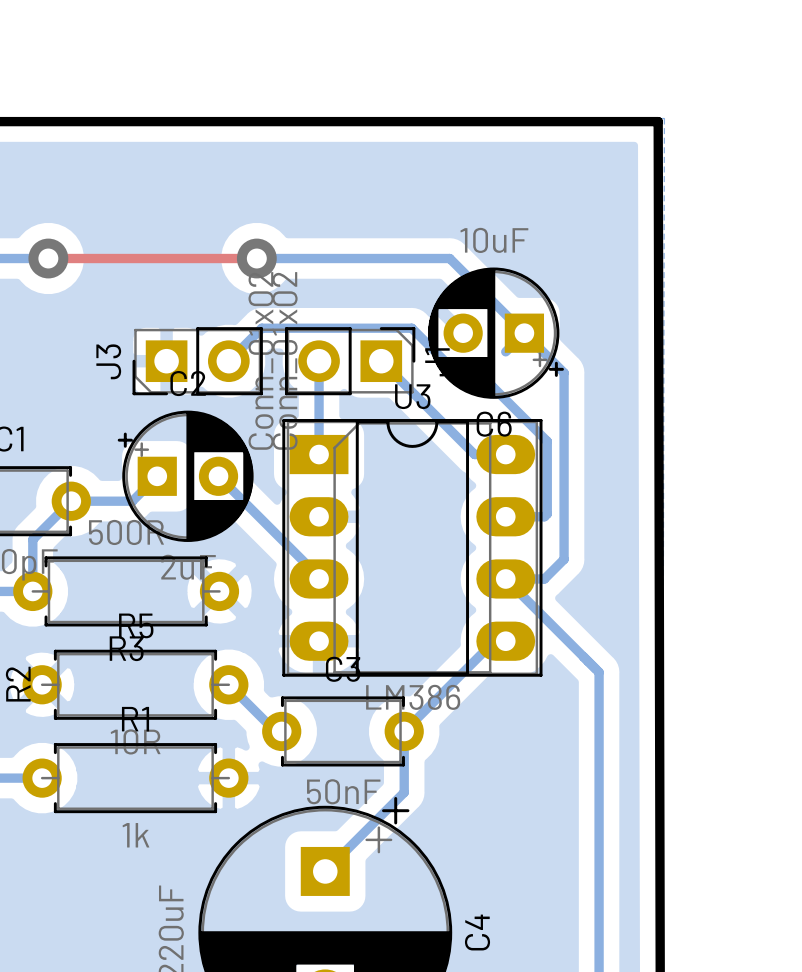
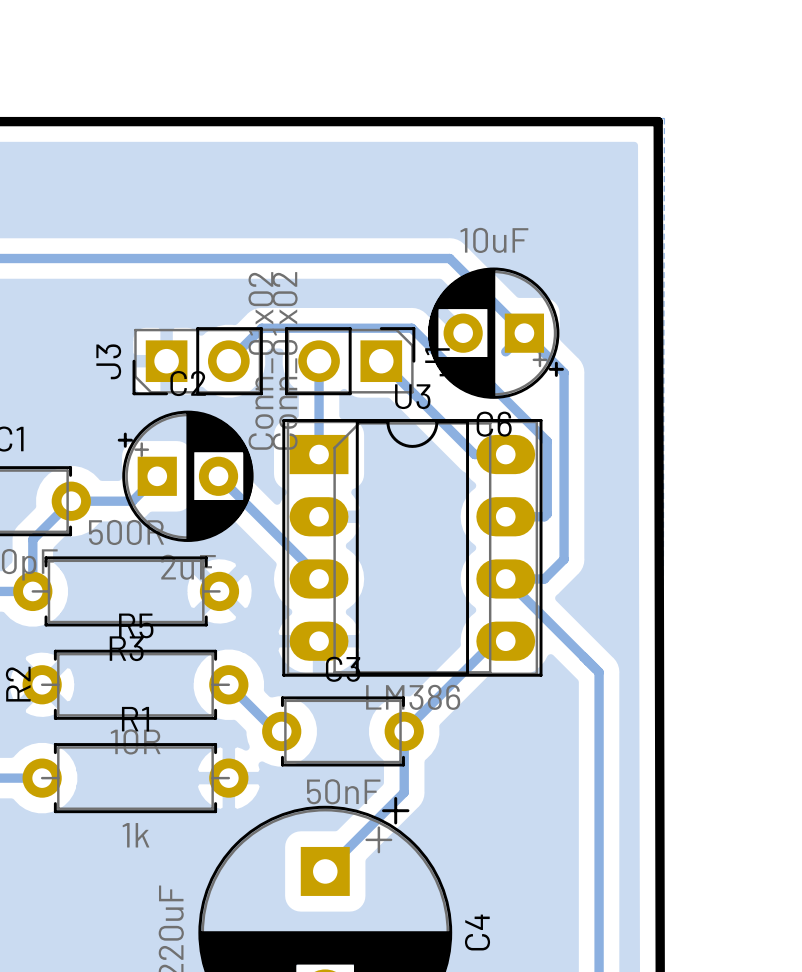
bottom track: none -> (48, 258) (256, 258)
top track: (48, 258) (256, 258) -> none
via: (48, 258) -> none
via: (256, 258) -> none

